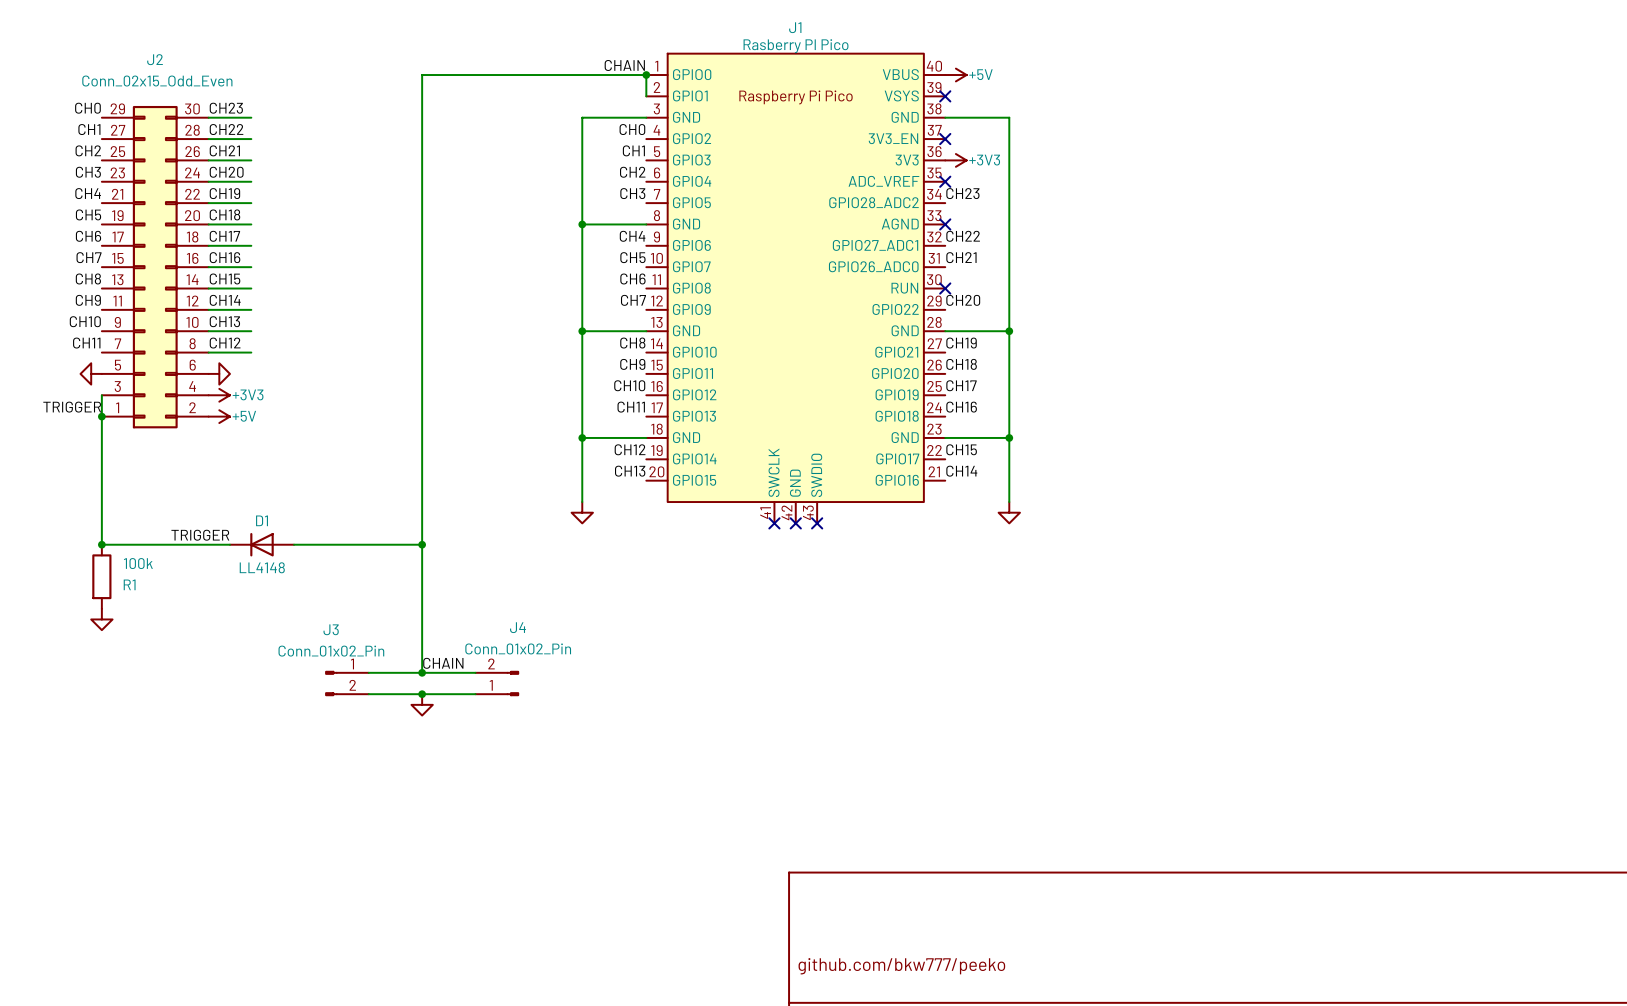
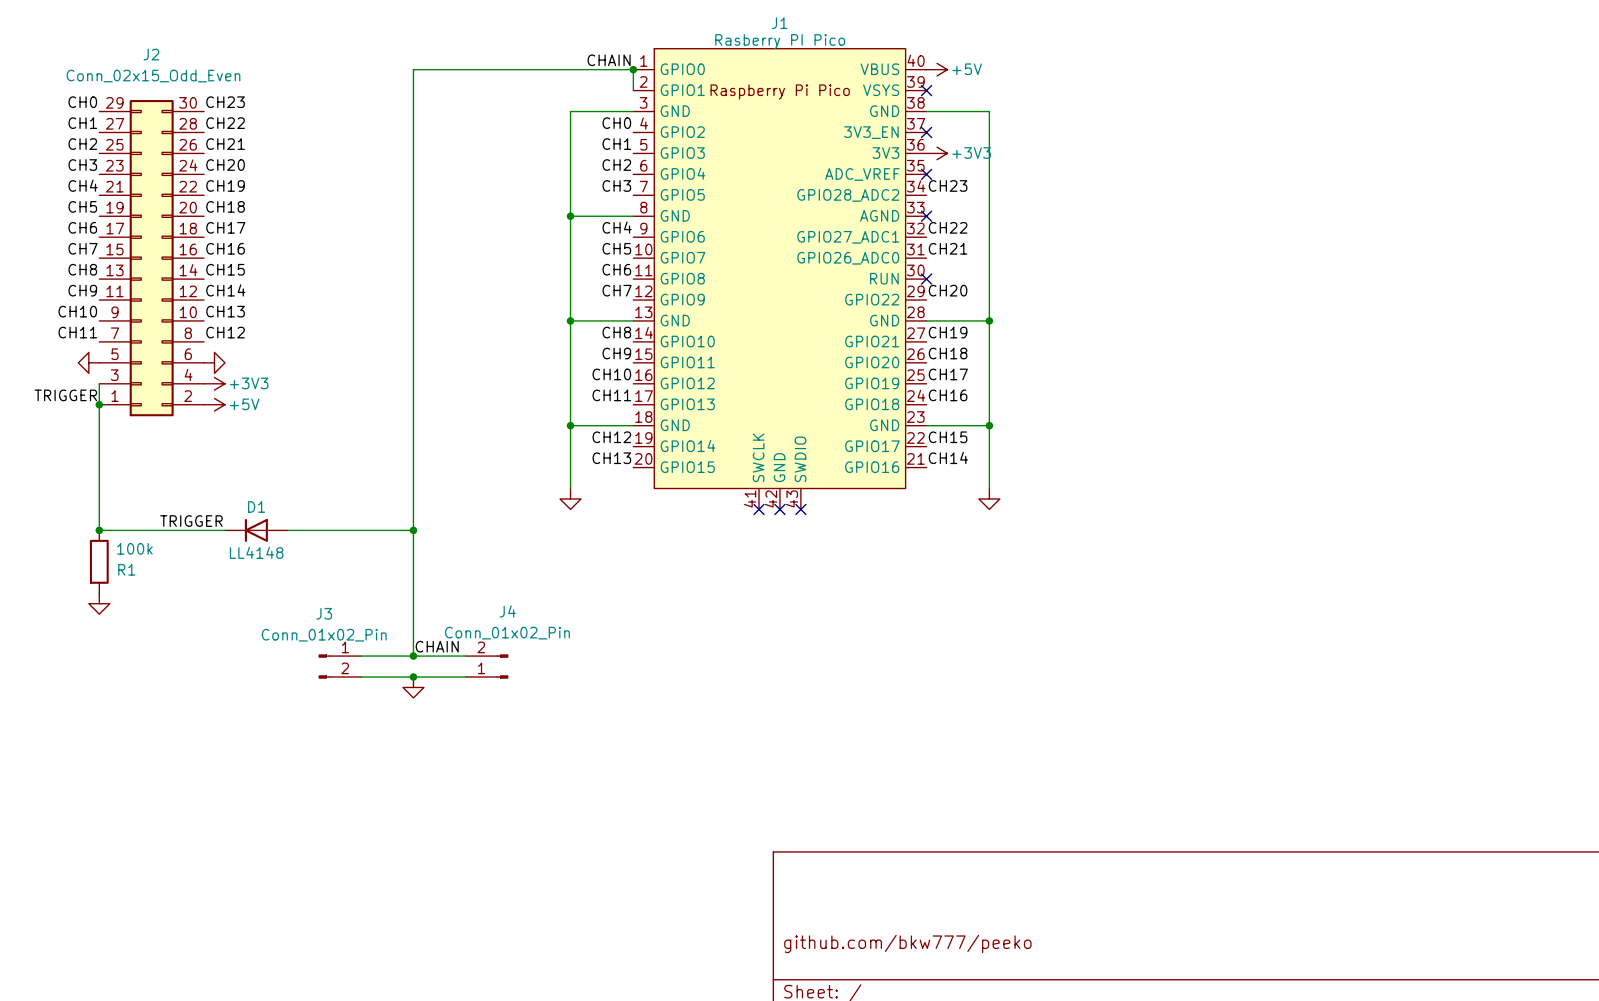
wire: (208, 117) (251, 117) -> none
wire: (208, 139) (251, 139) -> none
wire: (208, 160) (251, 160) -> none
wire: (208, 181) (251, 181) -> none
wire: (208, 203) (251, 203) -> none
wire: (208, 224) (251, 224) -> none
wire: (208, 245) (251, 245) -> none
wire: (208, 267) (251, 267) -> none
wire: (208, 288) (251, 288) -> none
wire: (208, 309) (251, 309) -> none
wire: (208, 331) (251, 331) -> none
wire: (208, 352) (251, 352) -> none

